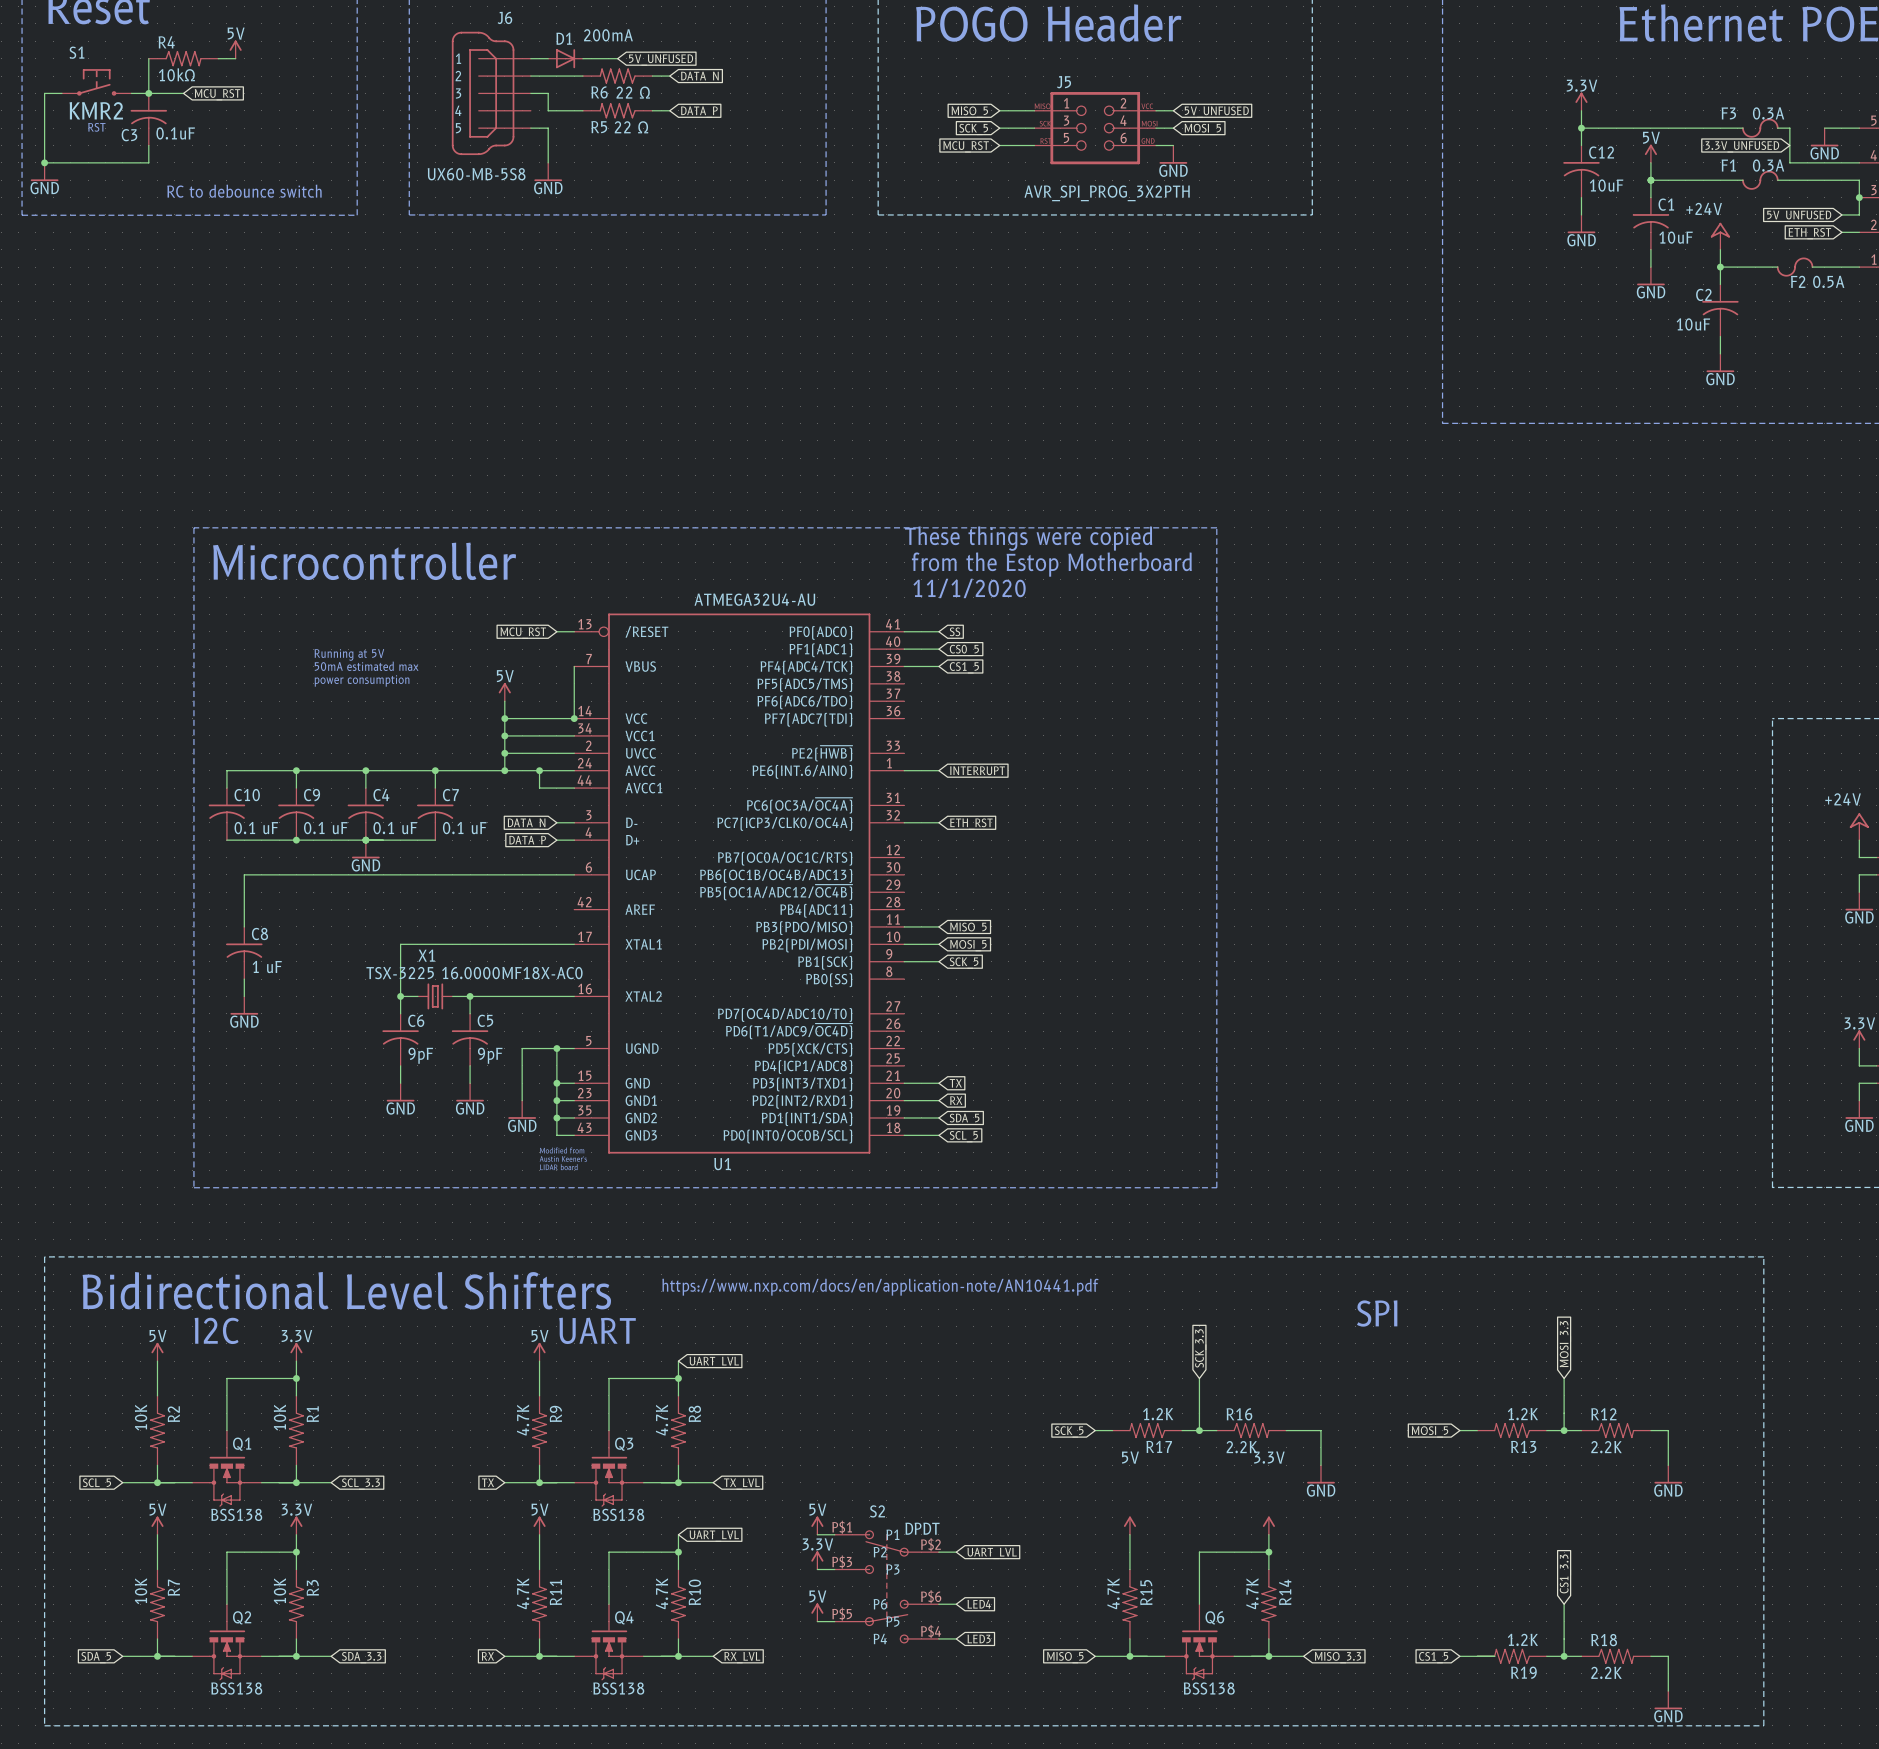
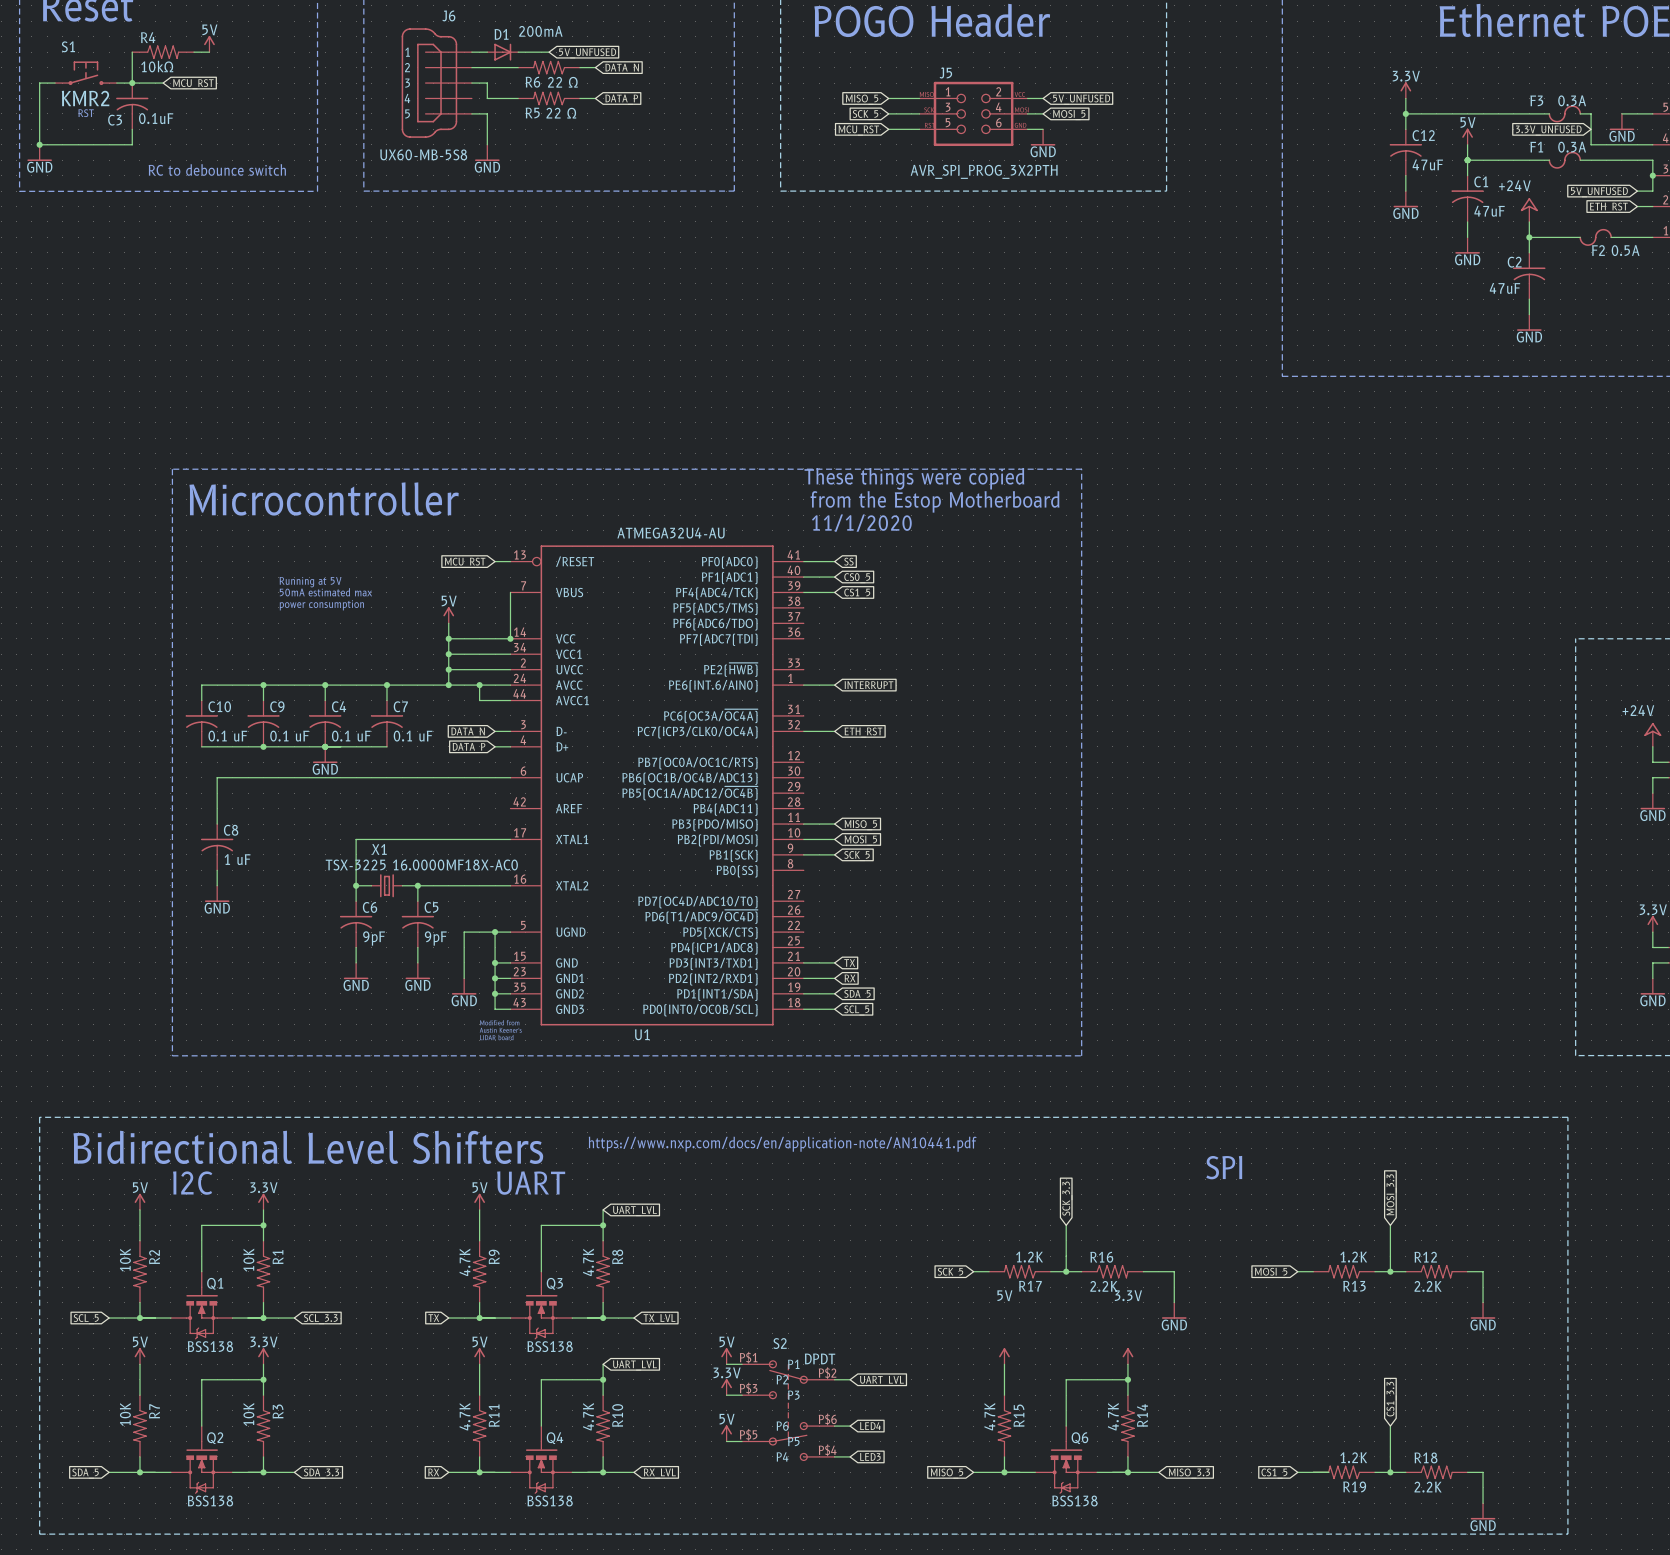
C12 value: 10uF (1606, 185) -> 47uF (1427, 164)
C1 value: 10uF (1676, 237) -> 47uF (1489, 211)
C2 value: 10uF (1693, 324) -> 47uF (1505, 288)

